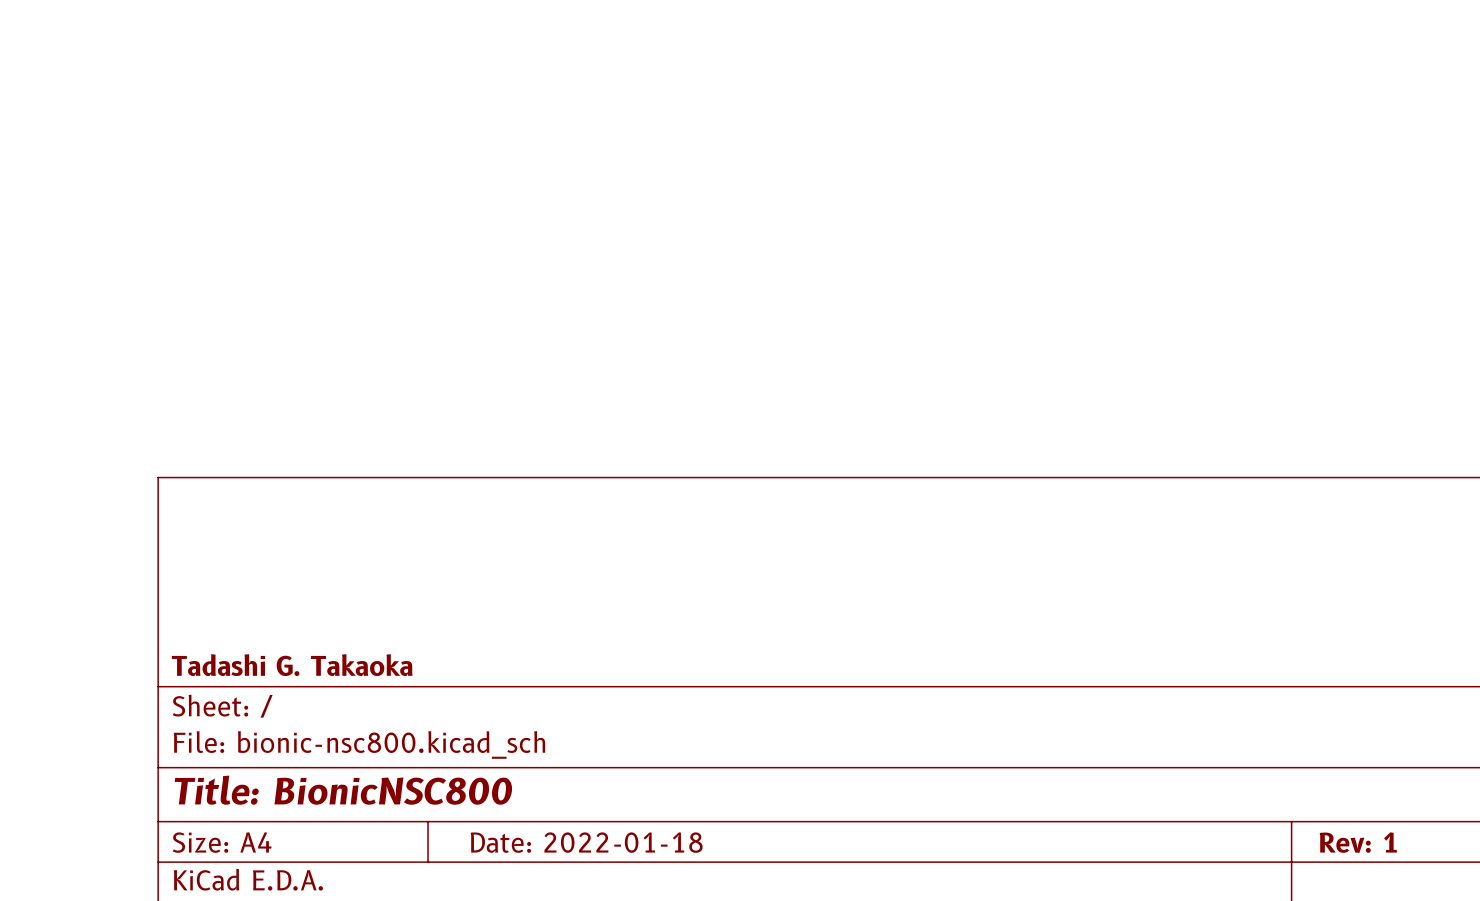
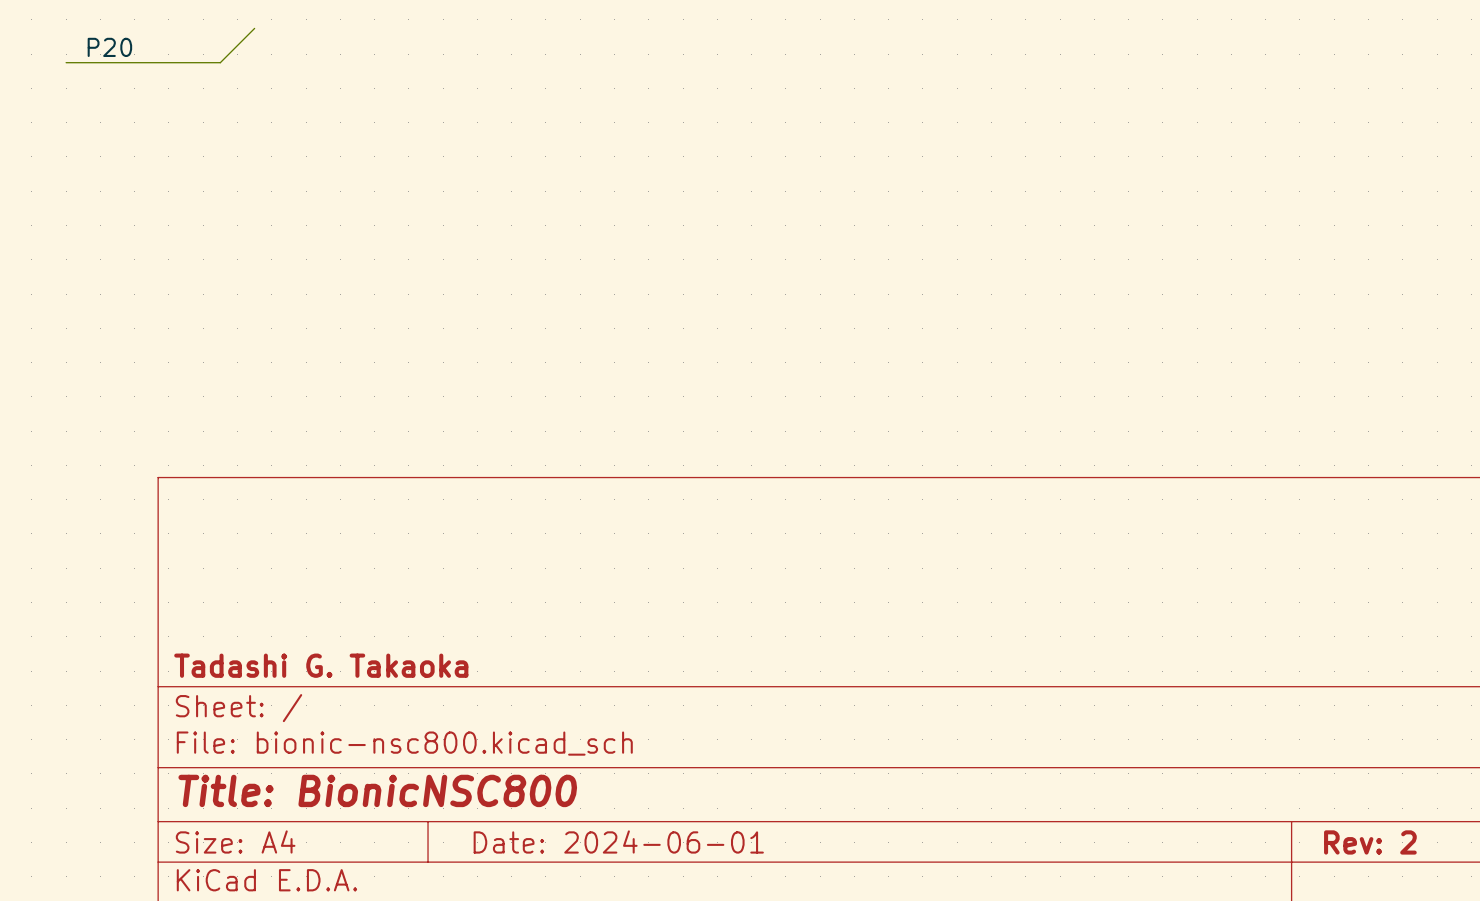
wire: none -> (254, 28) (220, 62) (66, 62)
label: none -> P20 (109, 47)
title block: Date: 2022-01-18 (586, 842) -> Date: 2024-06-01 (618, 841)
title block: Rev: 1 (1358, 842) -> Rev: 2 (1370, 842)

